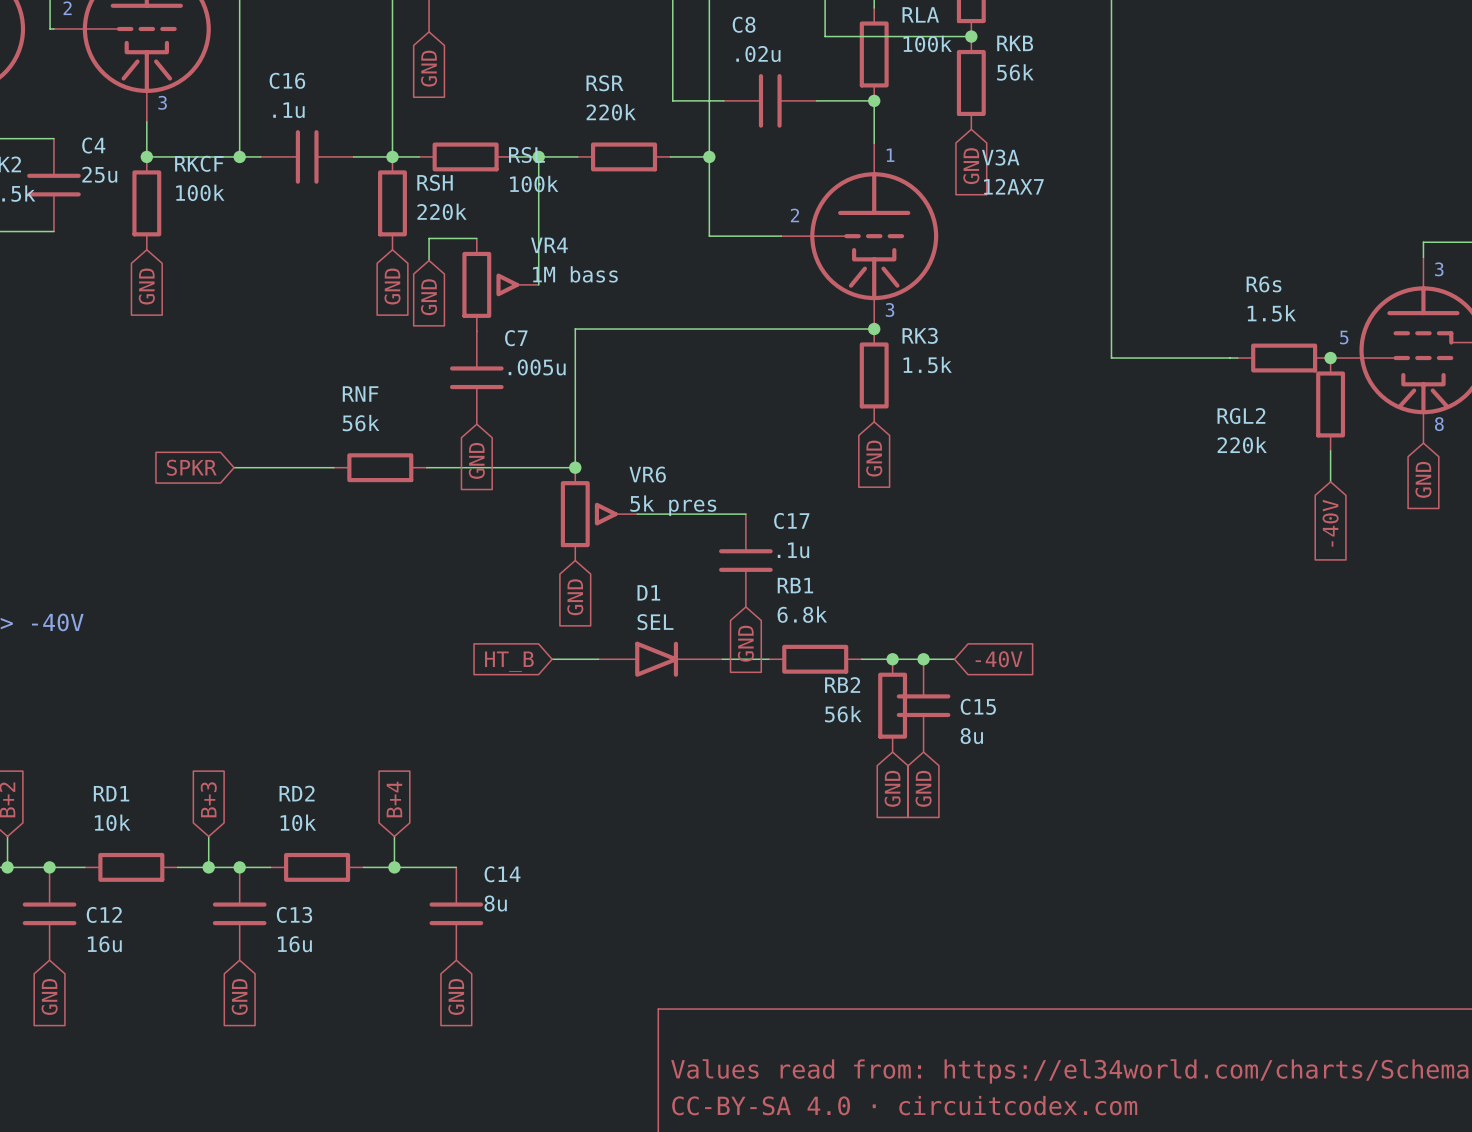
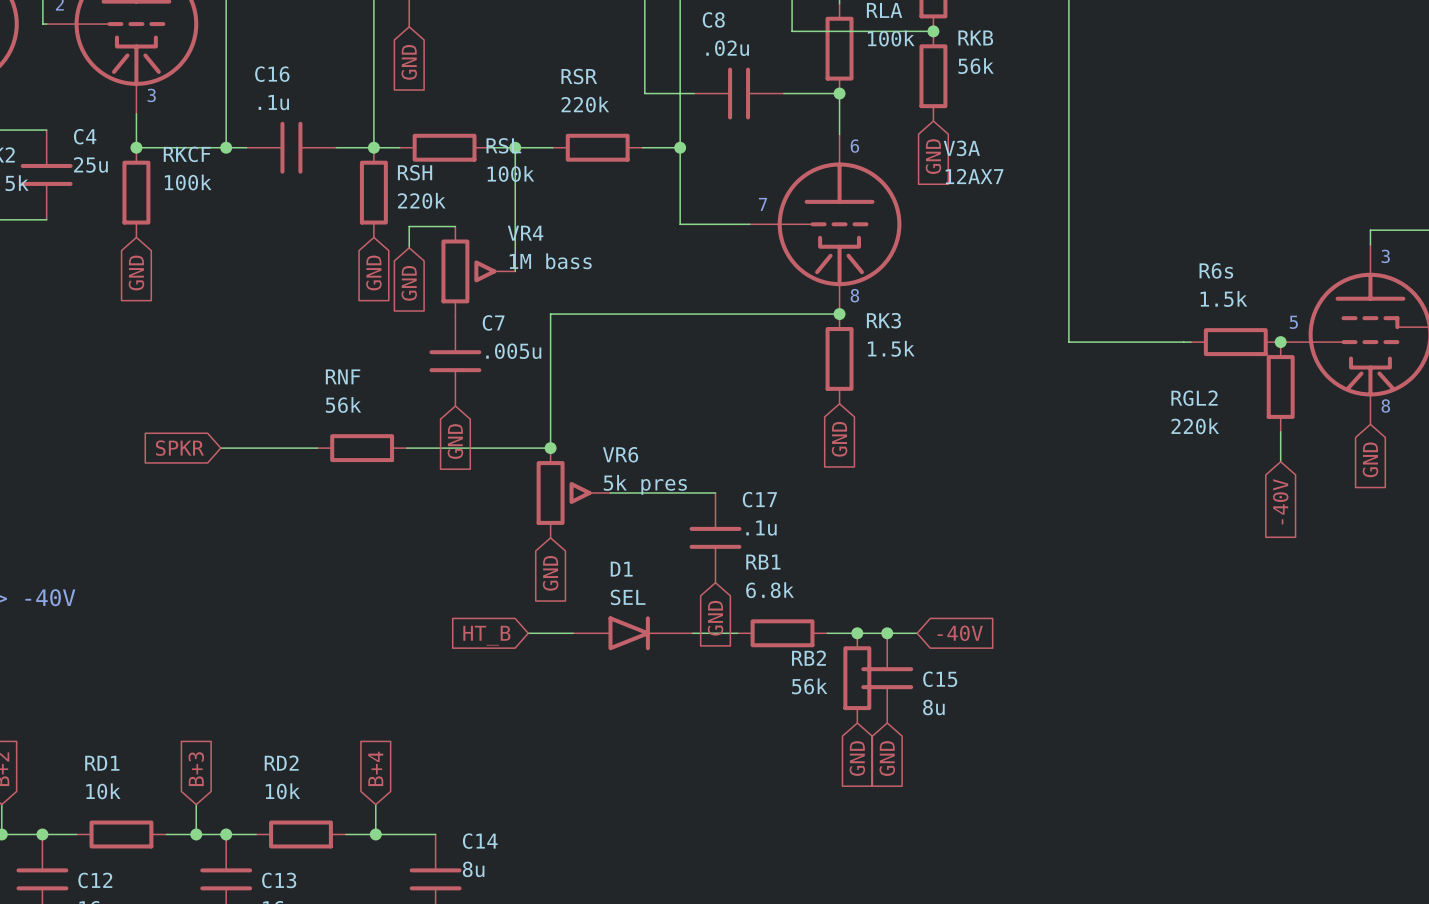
text: 1 (890, 155) -> 6 (854, 146)
text: 2 (794, 215) -> 7 (763, 204)
text: 3 (890, 310) -> 8 (854, 295)

